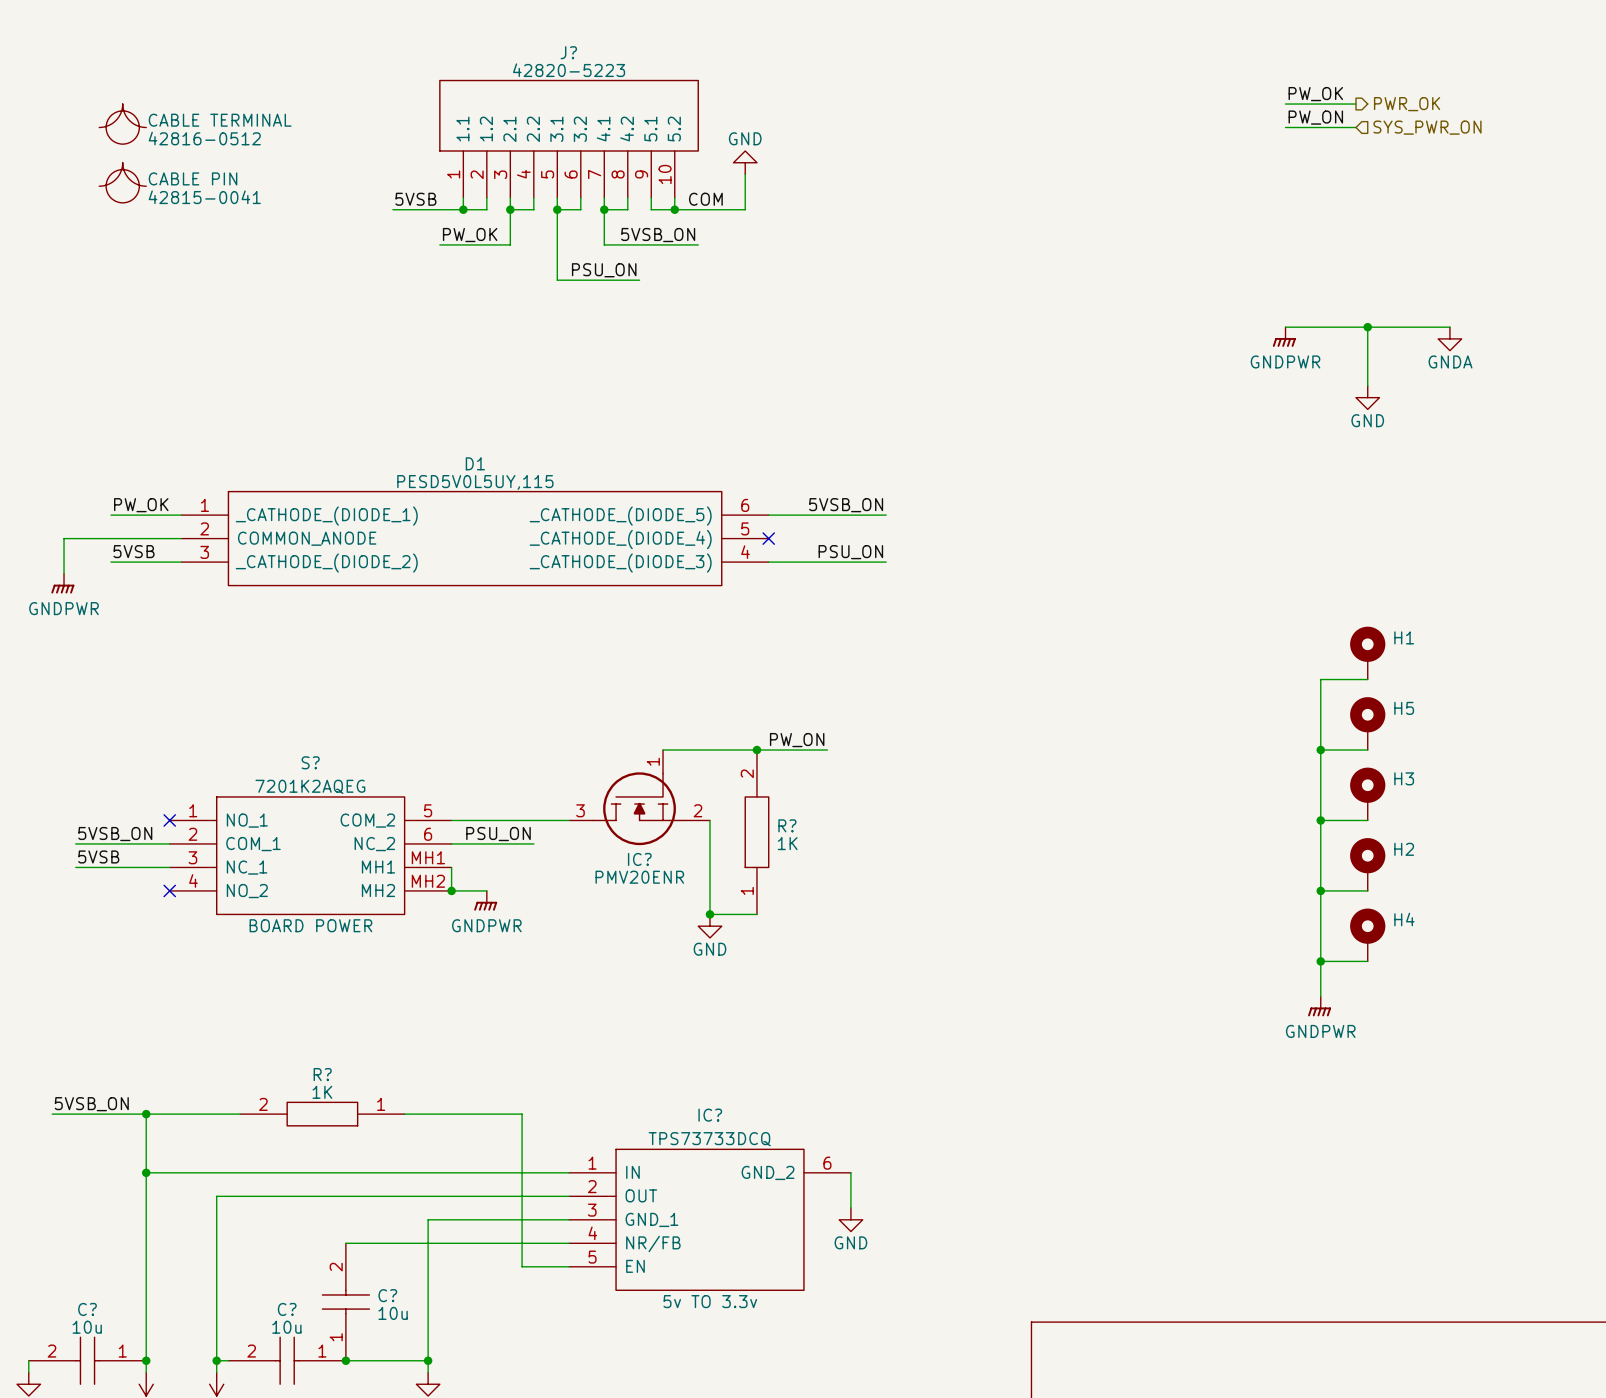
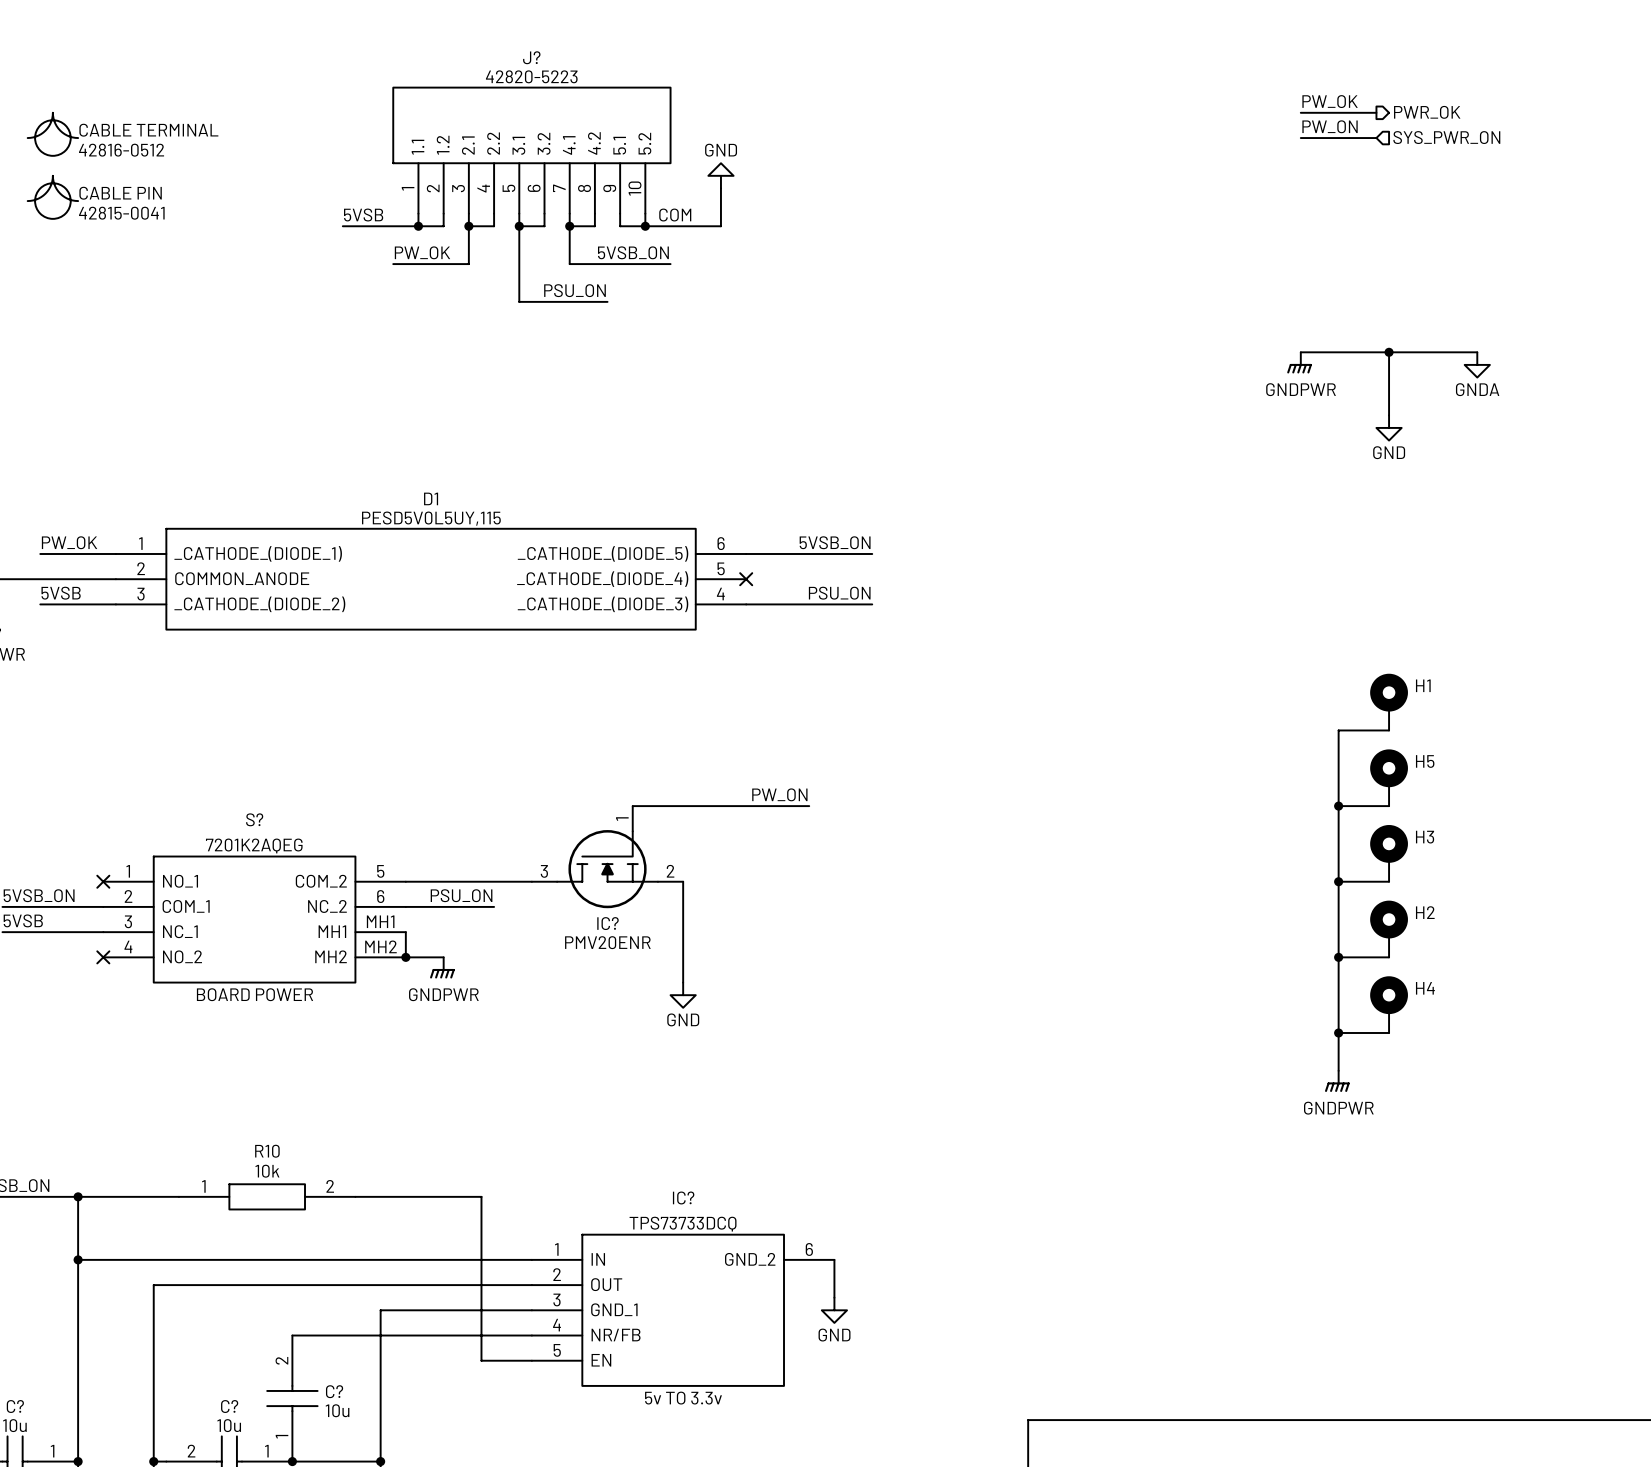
junction: (756, 750) -> none
R?: 1K (756, 832) -> none
wire: (710, 914) (756, 914) -> none
junction: (710, 914) -> none
R? name: R? (322, 1074) -> R10 (267, 1151)
R? value: 1K (322, 1092) -> 10k (267, 1171)
R? rotation: 0° (322, 1114) -> 180° (267, 1196)

